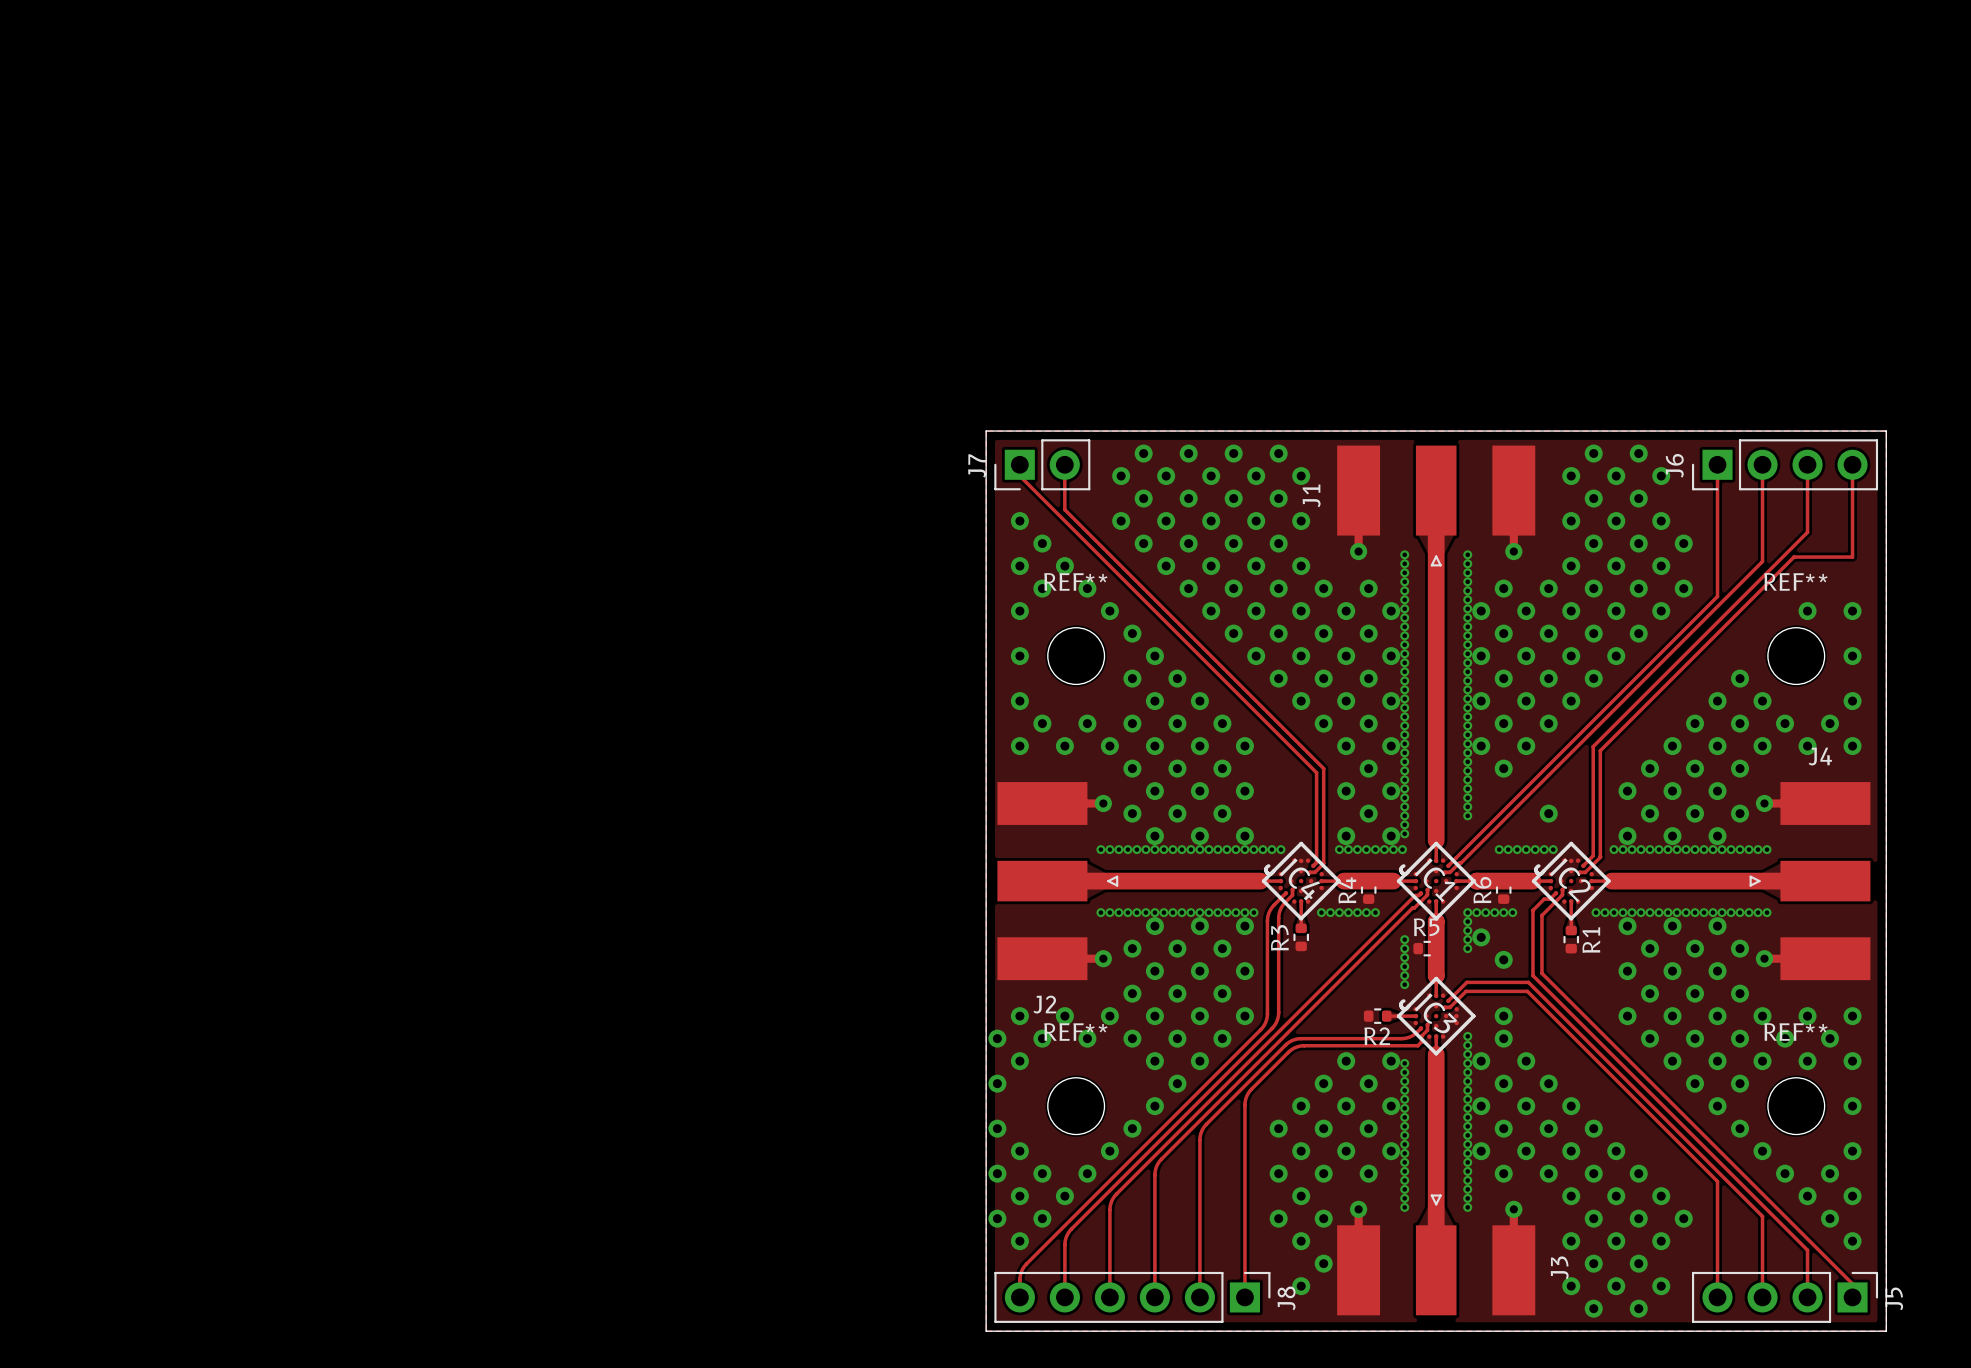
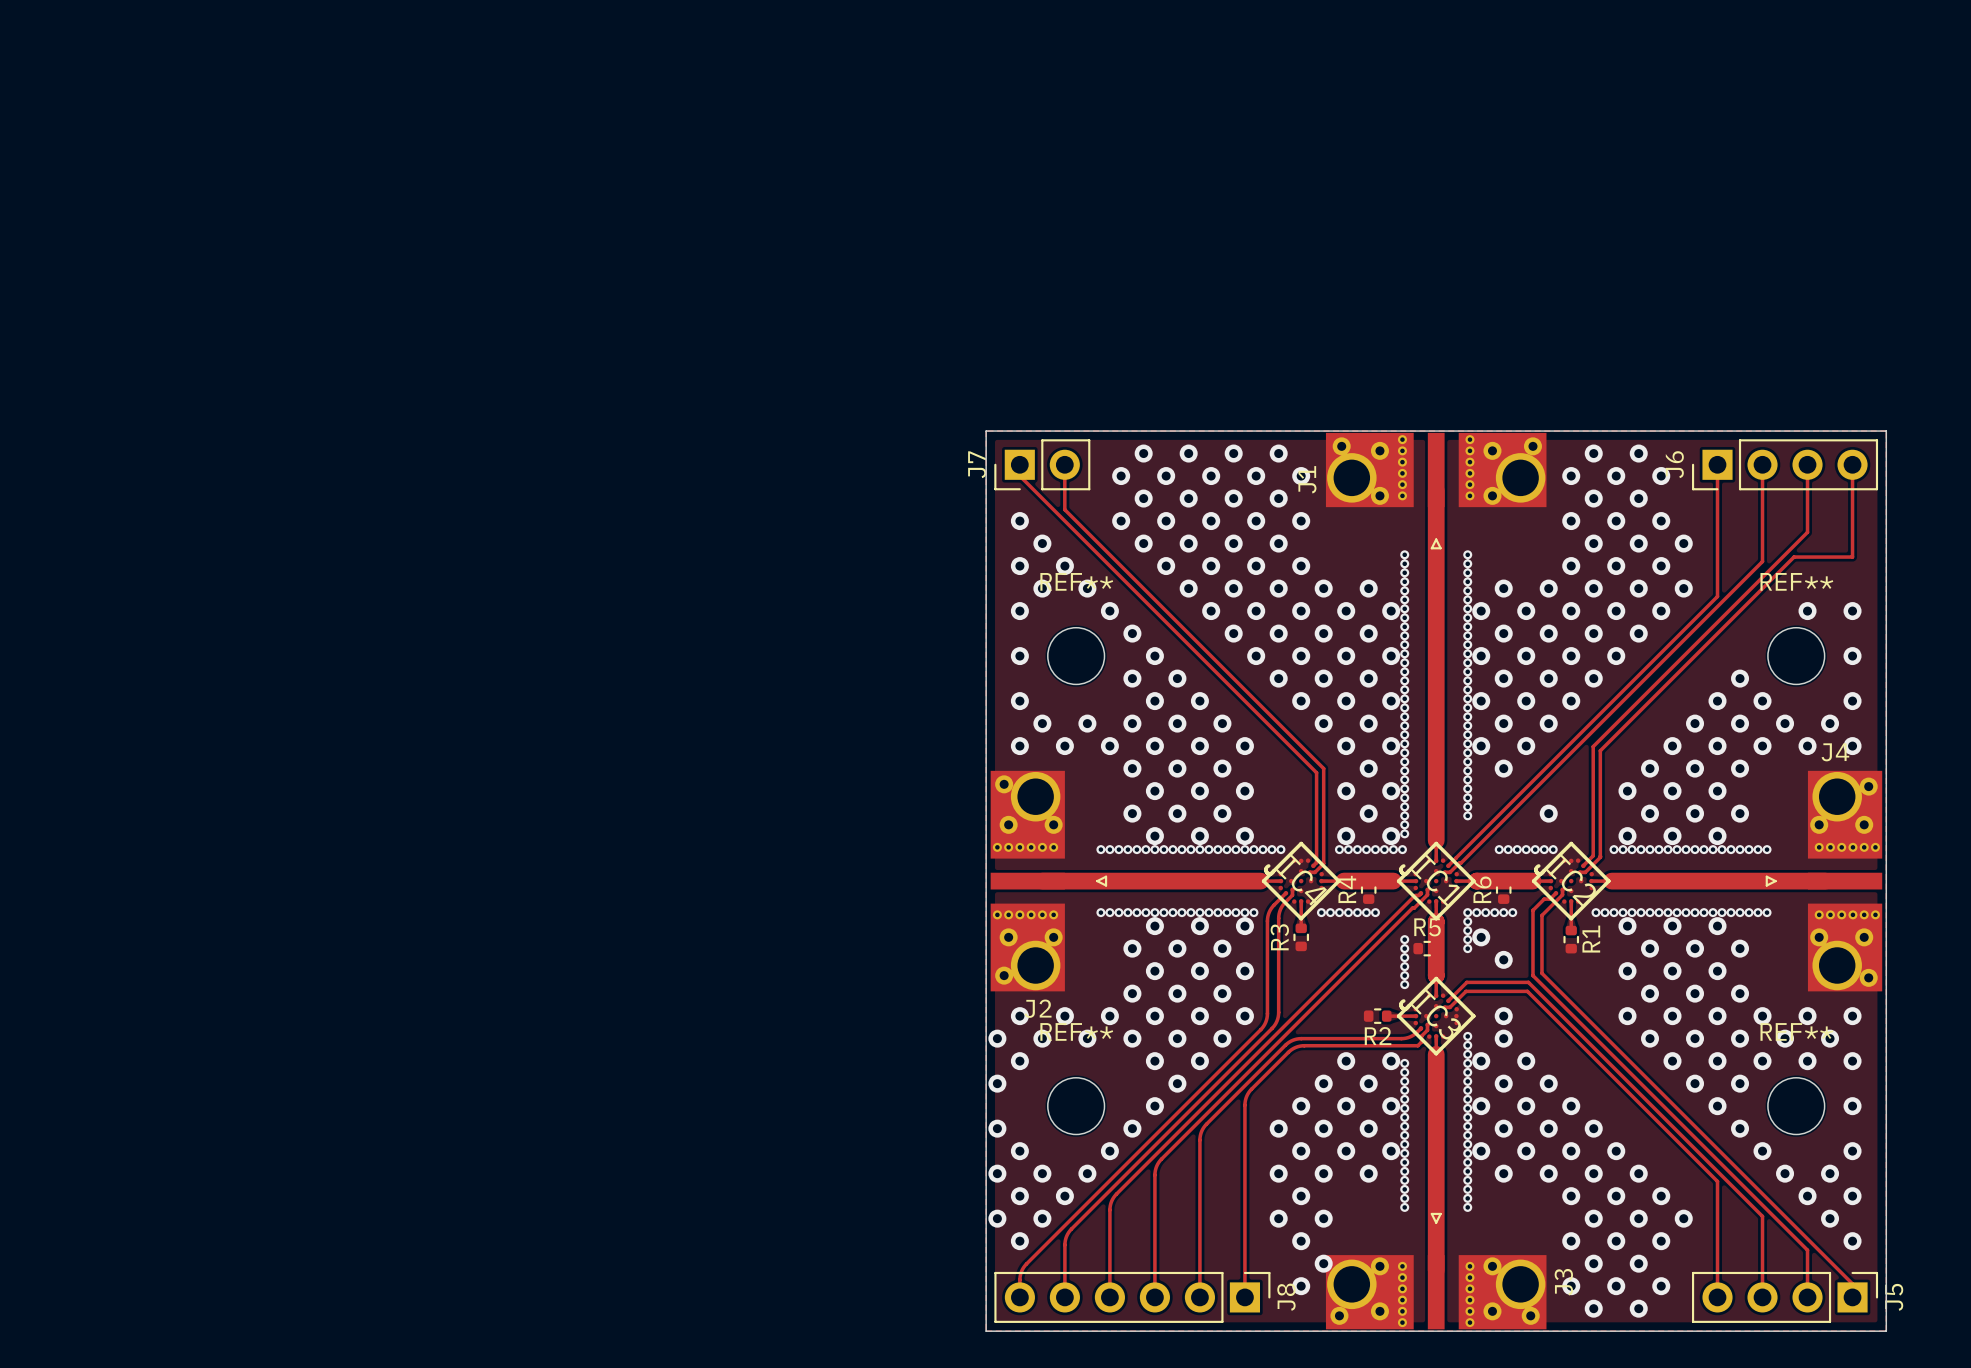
J1 footprint: [1337, 445, 1536, 567] -> [1325, 432, 1547, 550]
J2 footprint: [997, 782, 1119, 981] -> [990, 770, 1108, 992]
J4 footprint: [1749, 782, 1871, 981] -> [1765, 770, 1883, 992]
J3 footprint: [1337, 1194, 1536, 1316] -> [1325, 1212, 1547, 1330]

